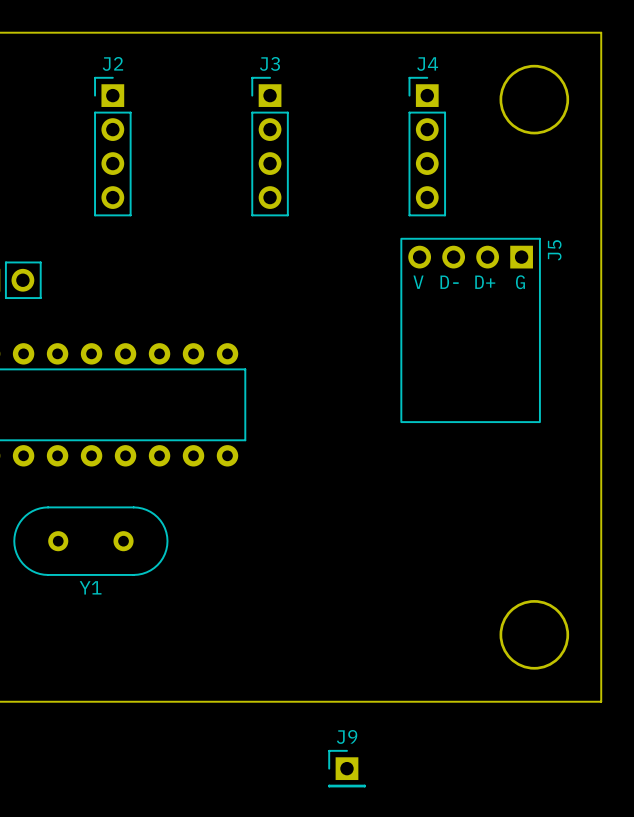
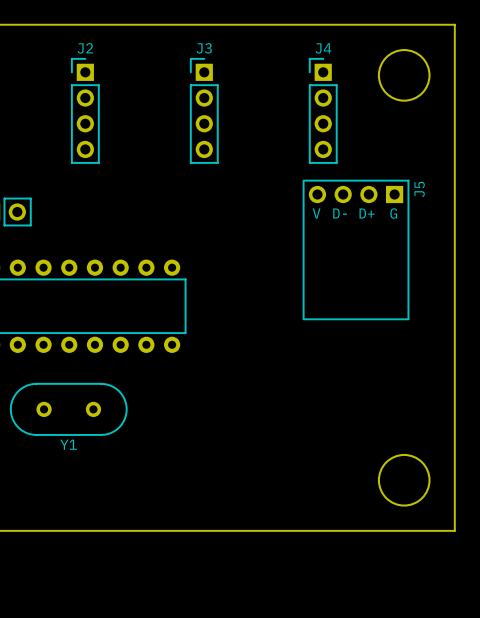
J9: (346, 768) -> none

